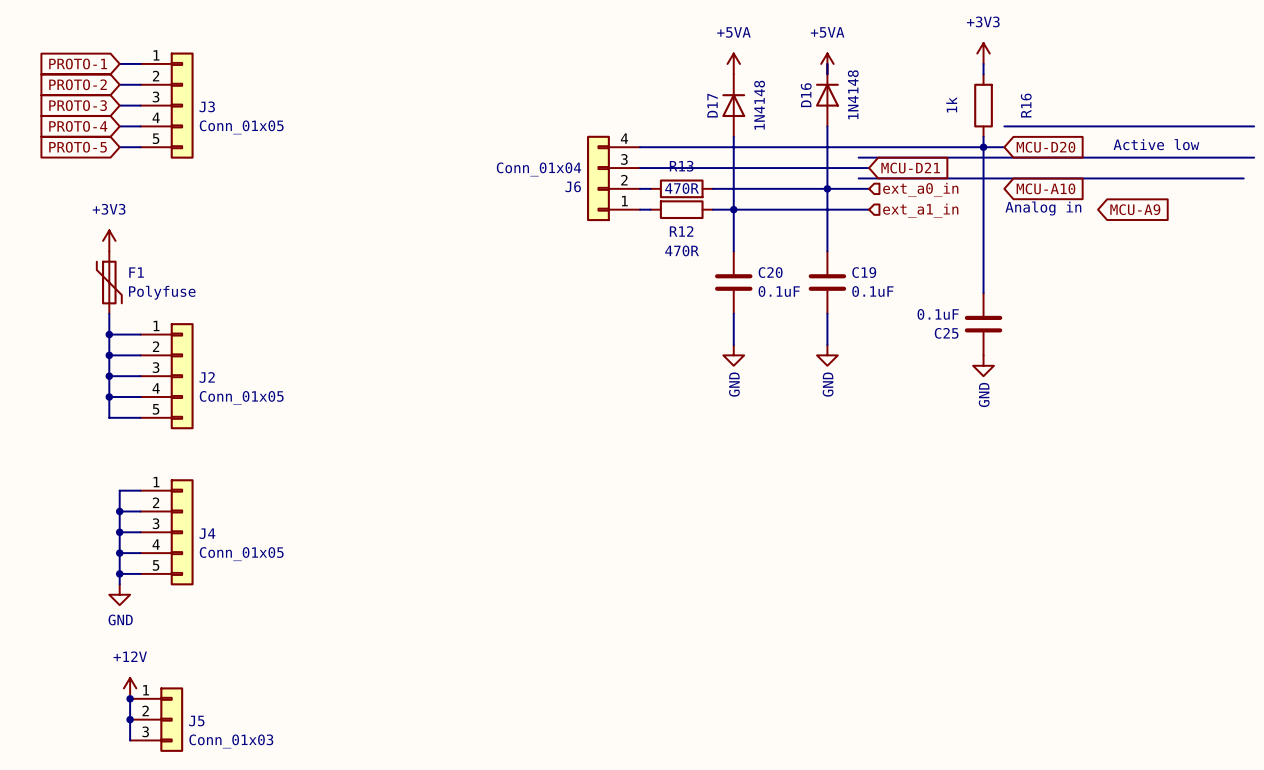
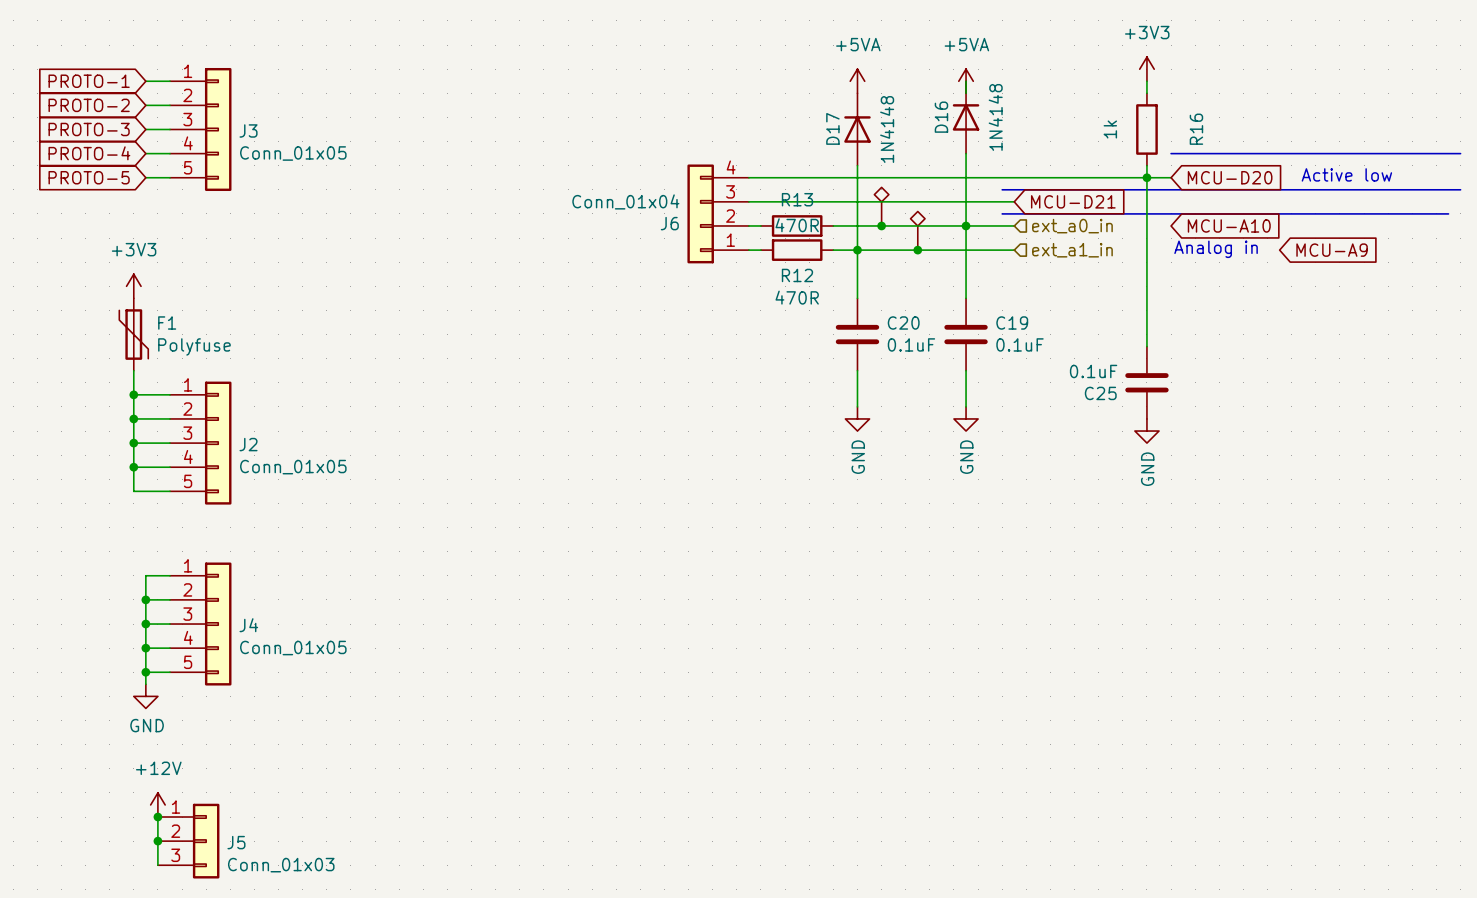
part: none -> (881, 206)
junction: none -> (881, 225)
part: none -> (917, 230)
junction: none -> (917, 250)

